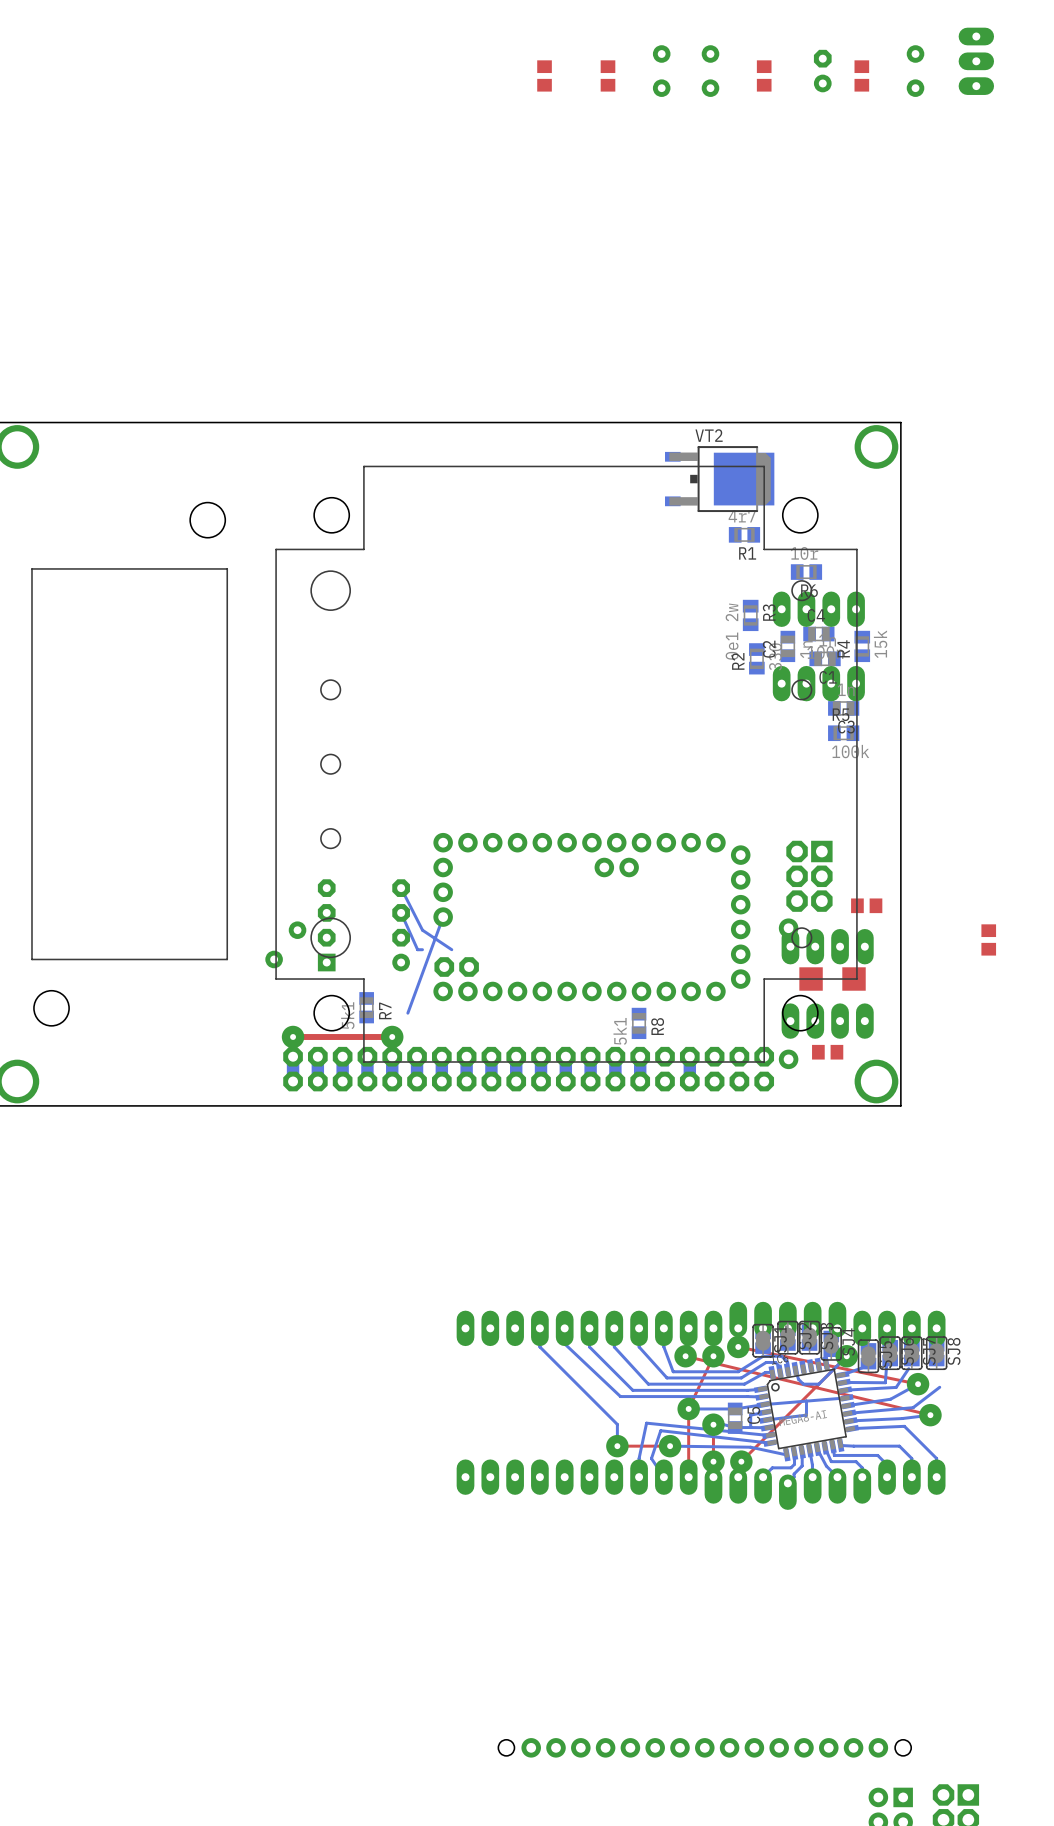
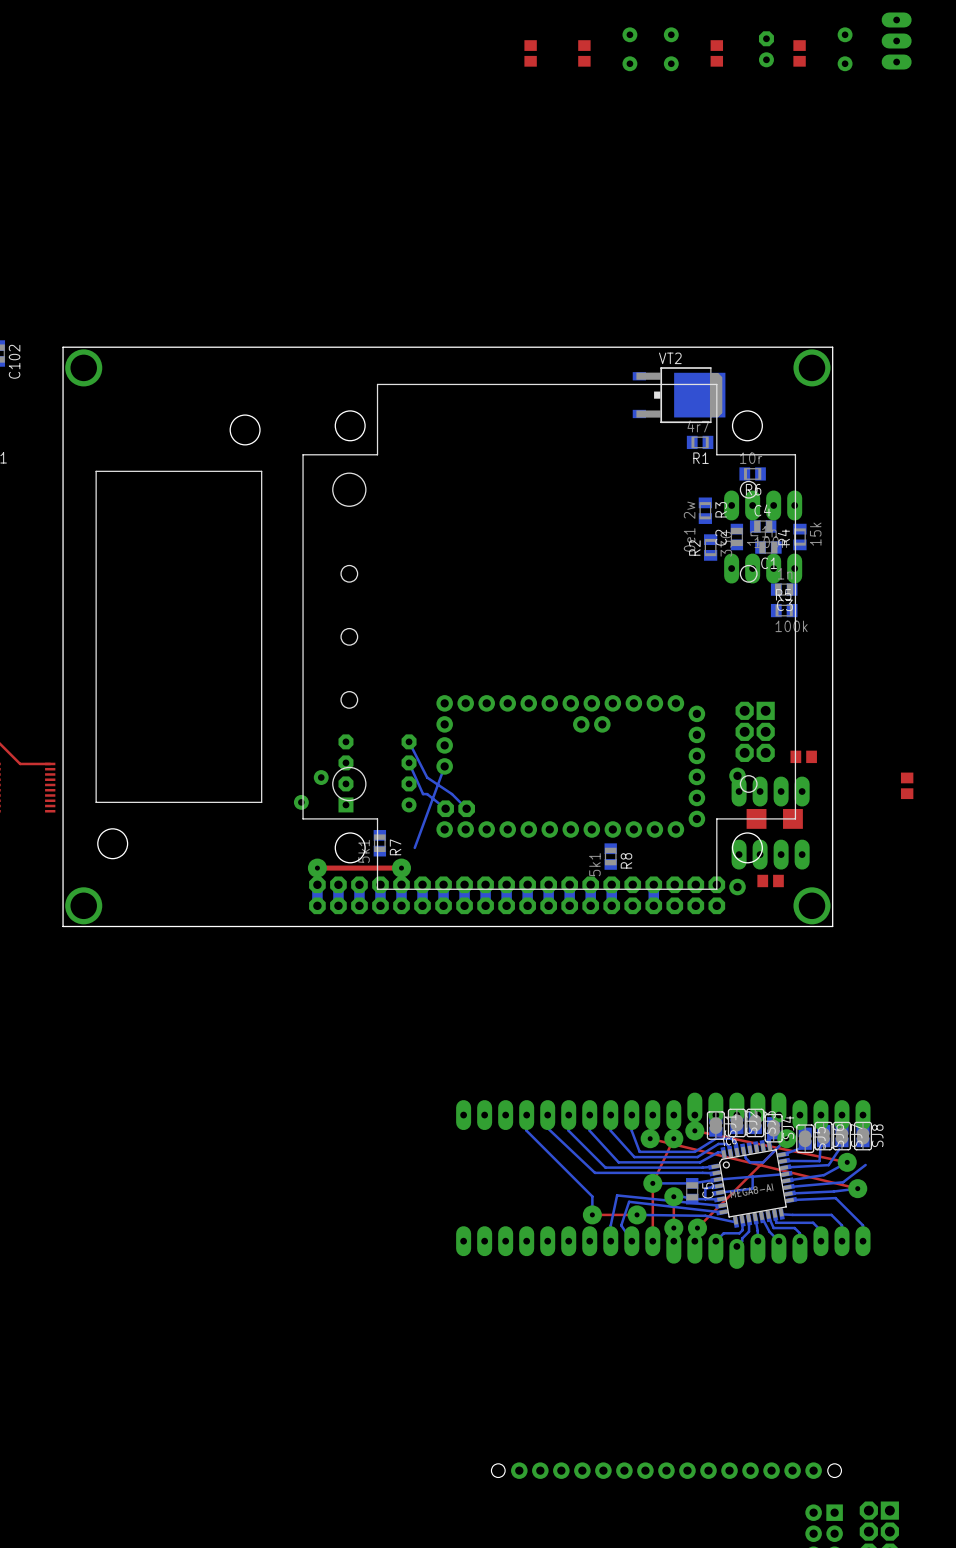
bottom track: none -> (427, 794) (445, 808)
bottom track: none -> (451, 794) (466, 808)

